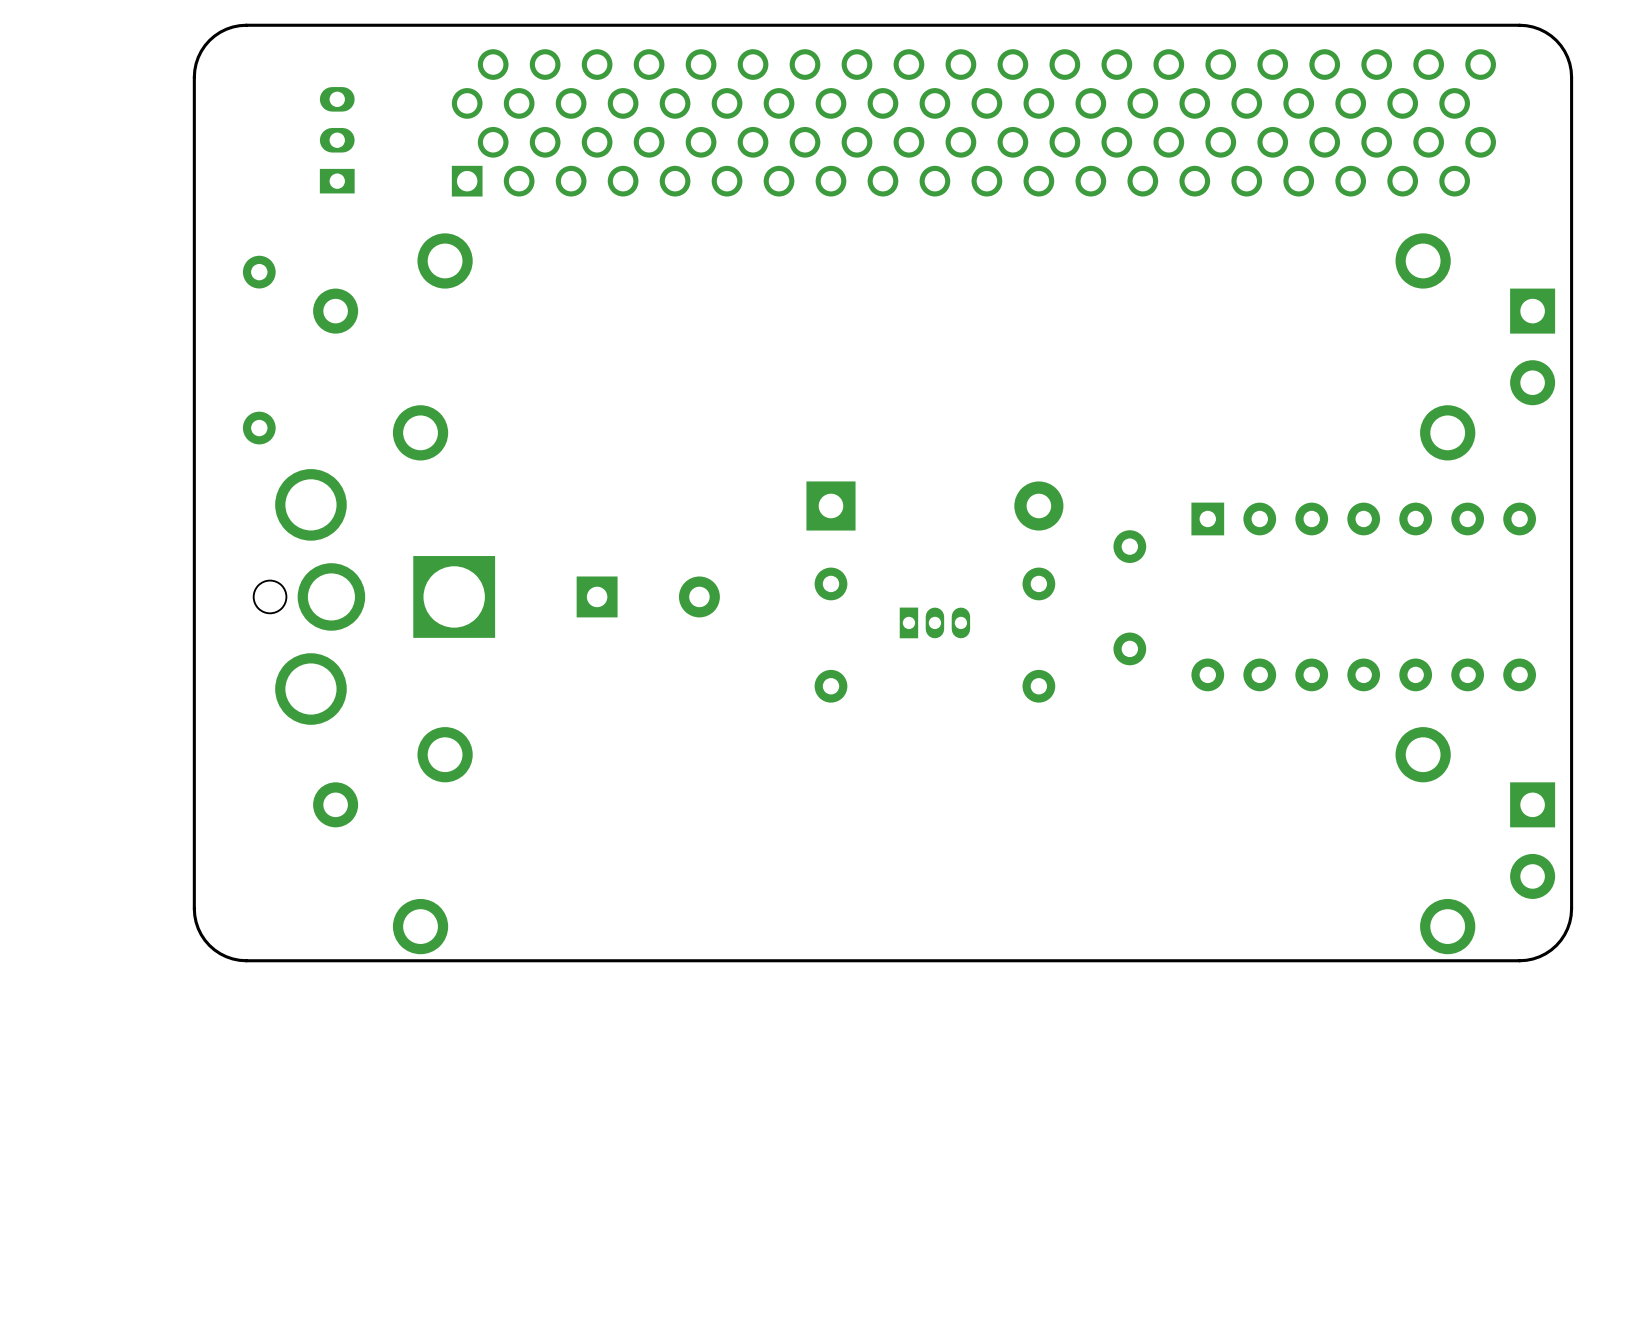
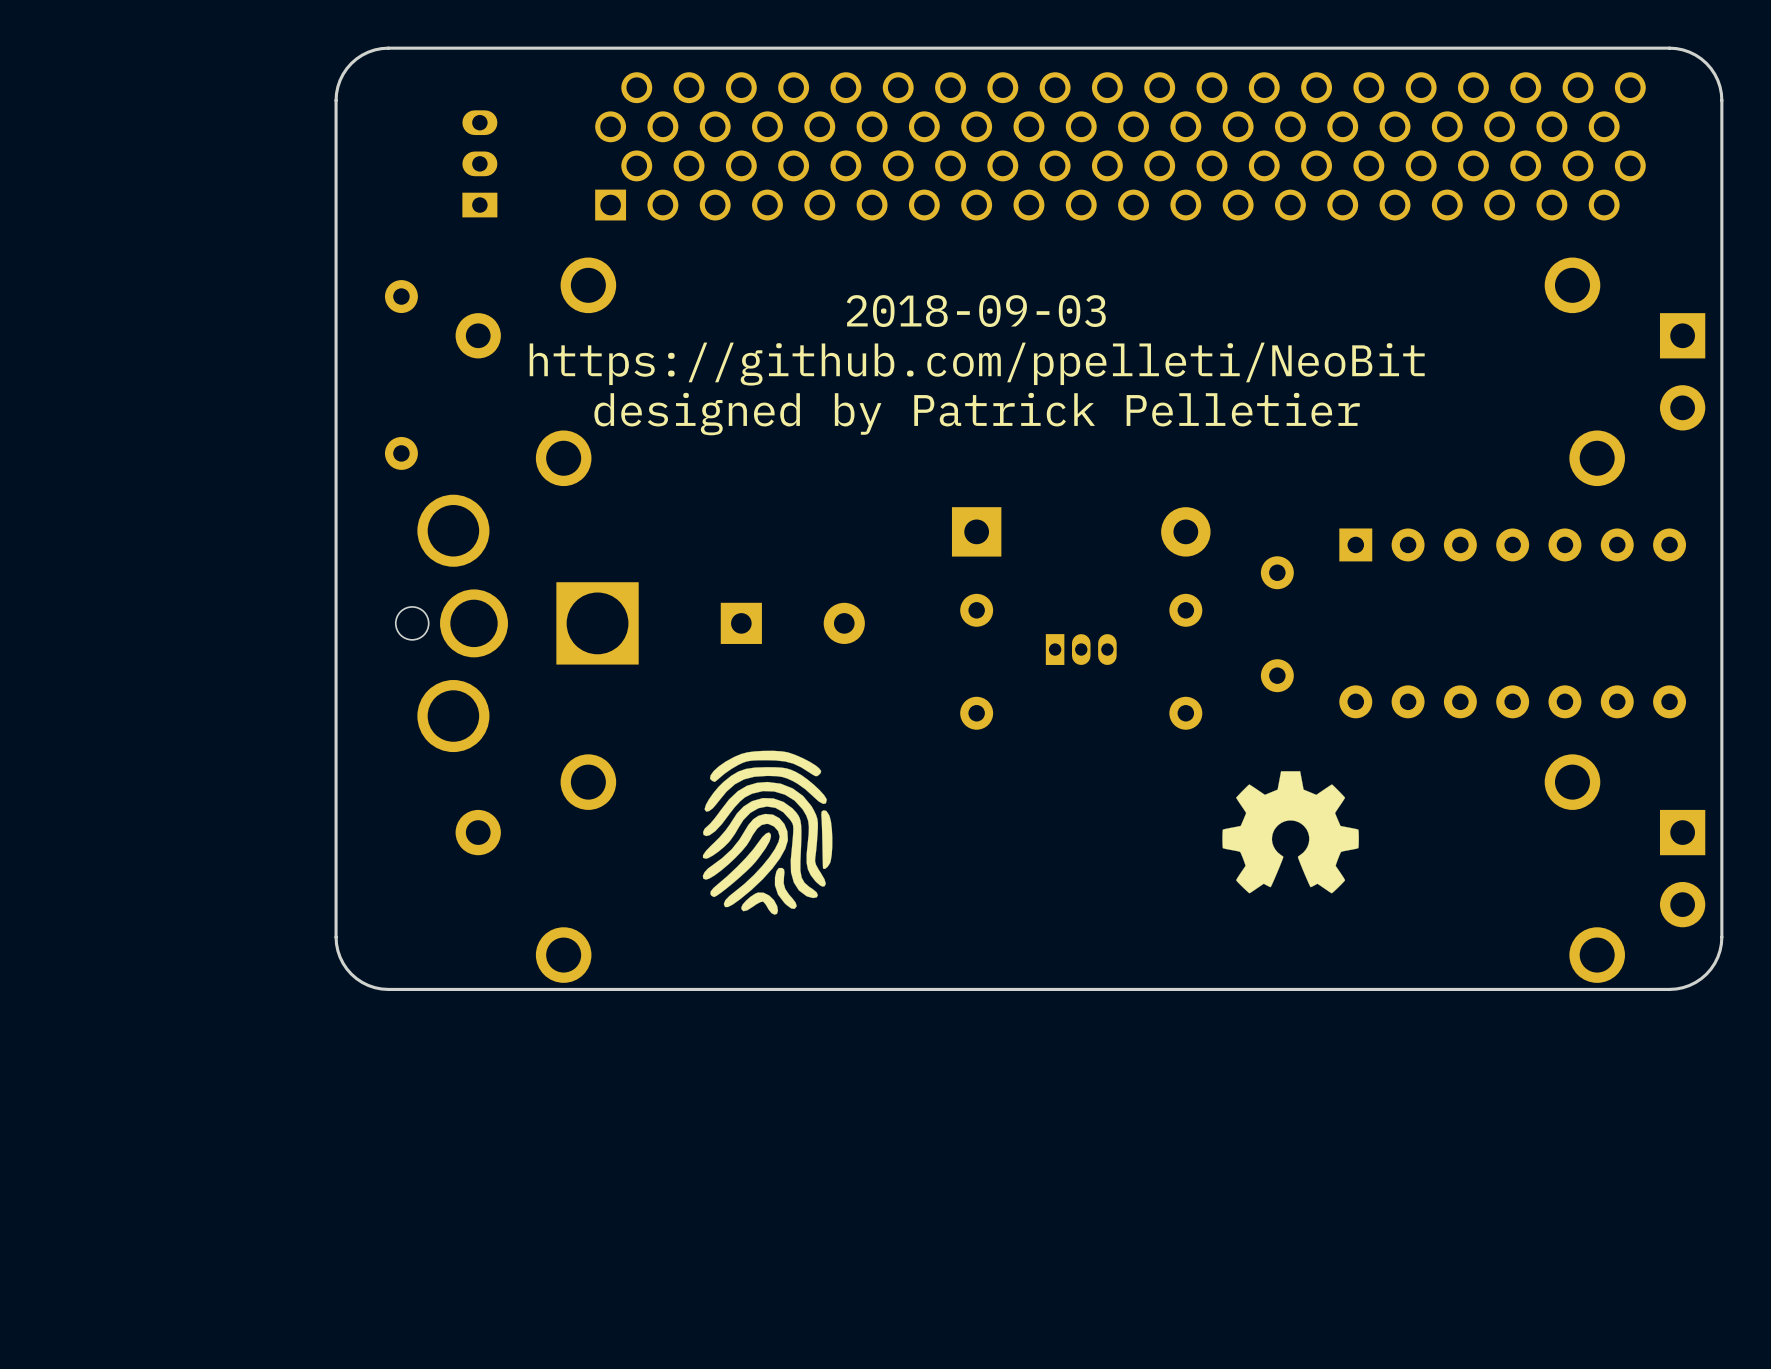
text: none -> 2018-09-03 (976, 311)
text: none -> https://github.com/ppelleti/NeoBit (977, 364)
text: none -> designed by Patrick Pelletier (977, 414)
drawing: none -> [702, 750, 833, 915]
drawing: none -> [1222, 771, 1359, 894]

